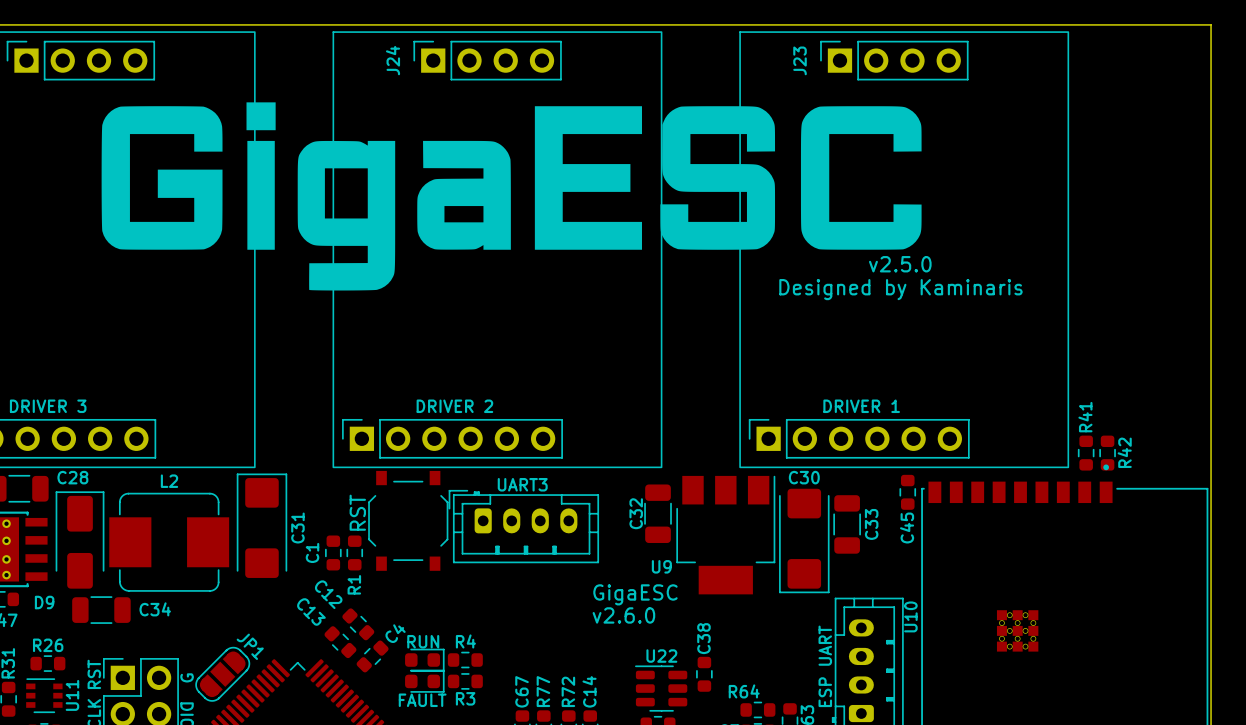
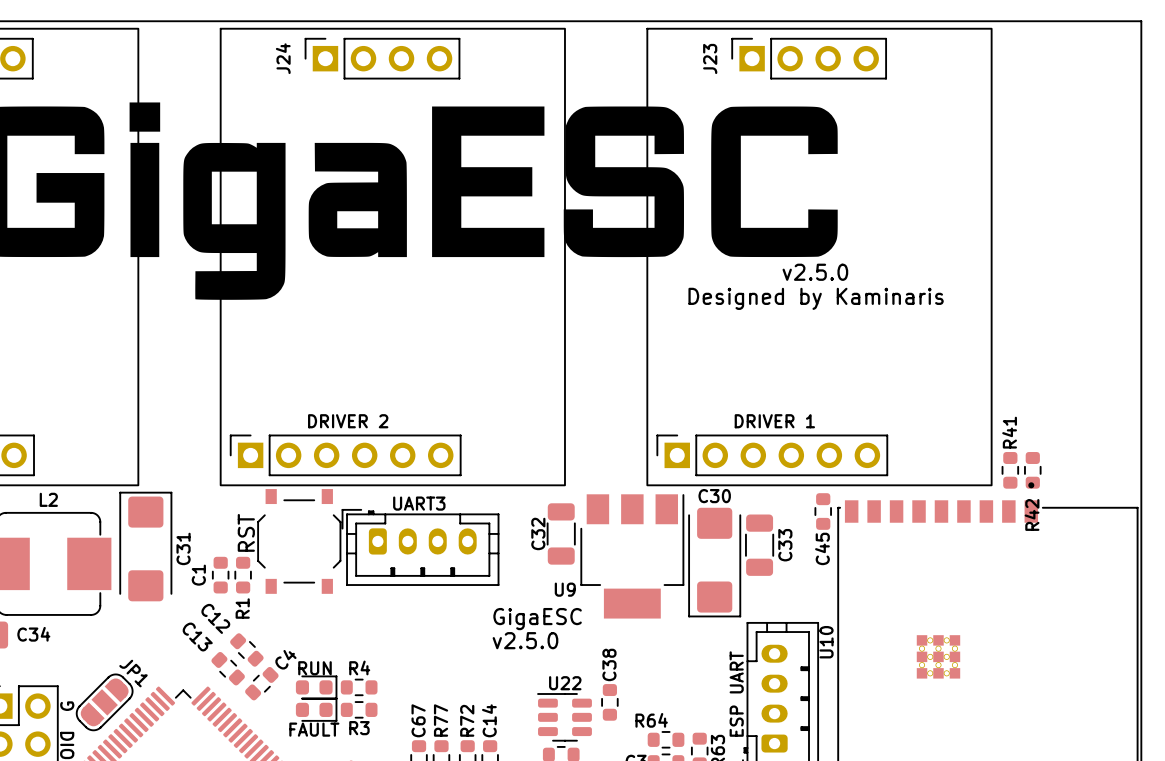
R42 name position: R42 (1124, 452) -> R42 (1032, 514)
text: v2.6.0 (623, 615) -> v2.5.0 (525, 640)

